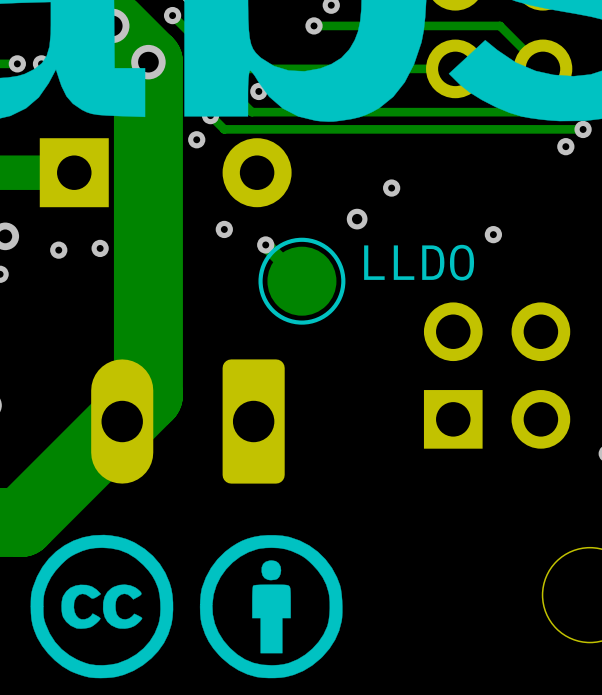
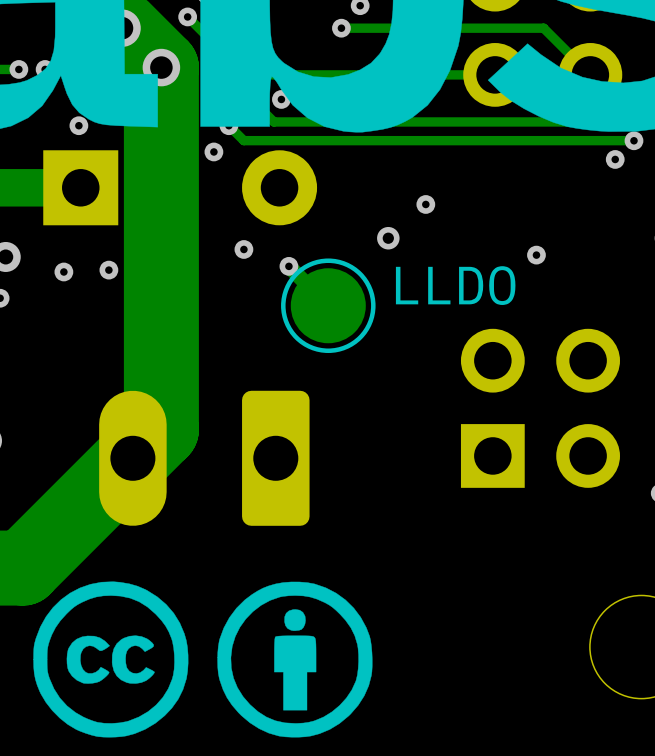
via: none -> (78, 125)

